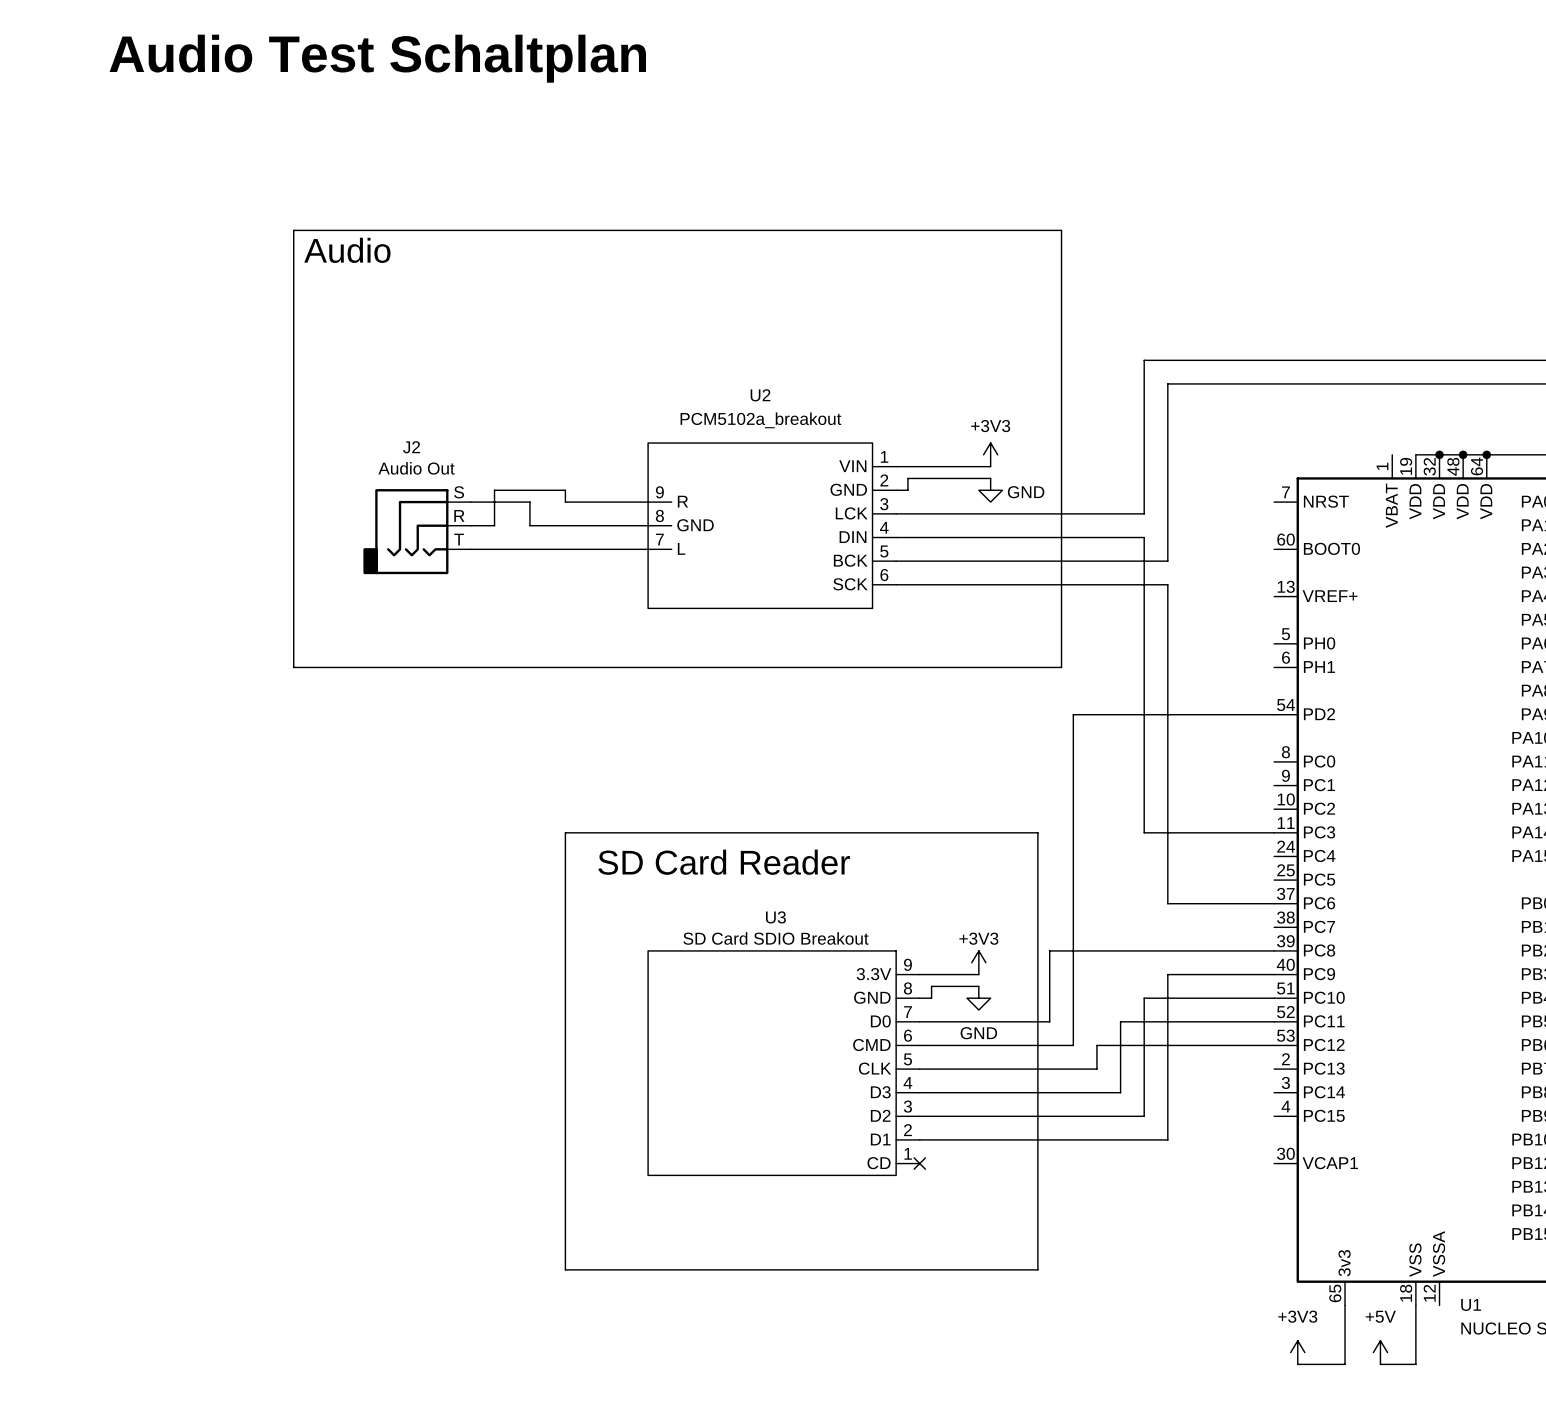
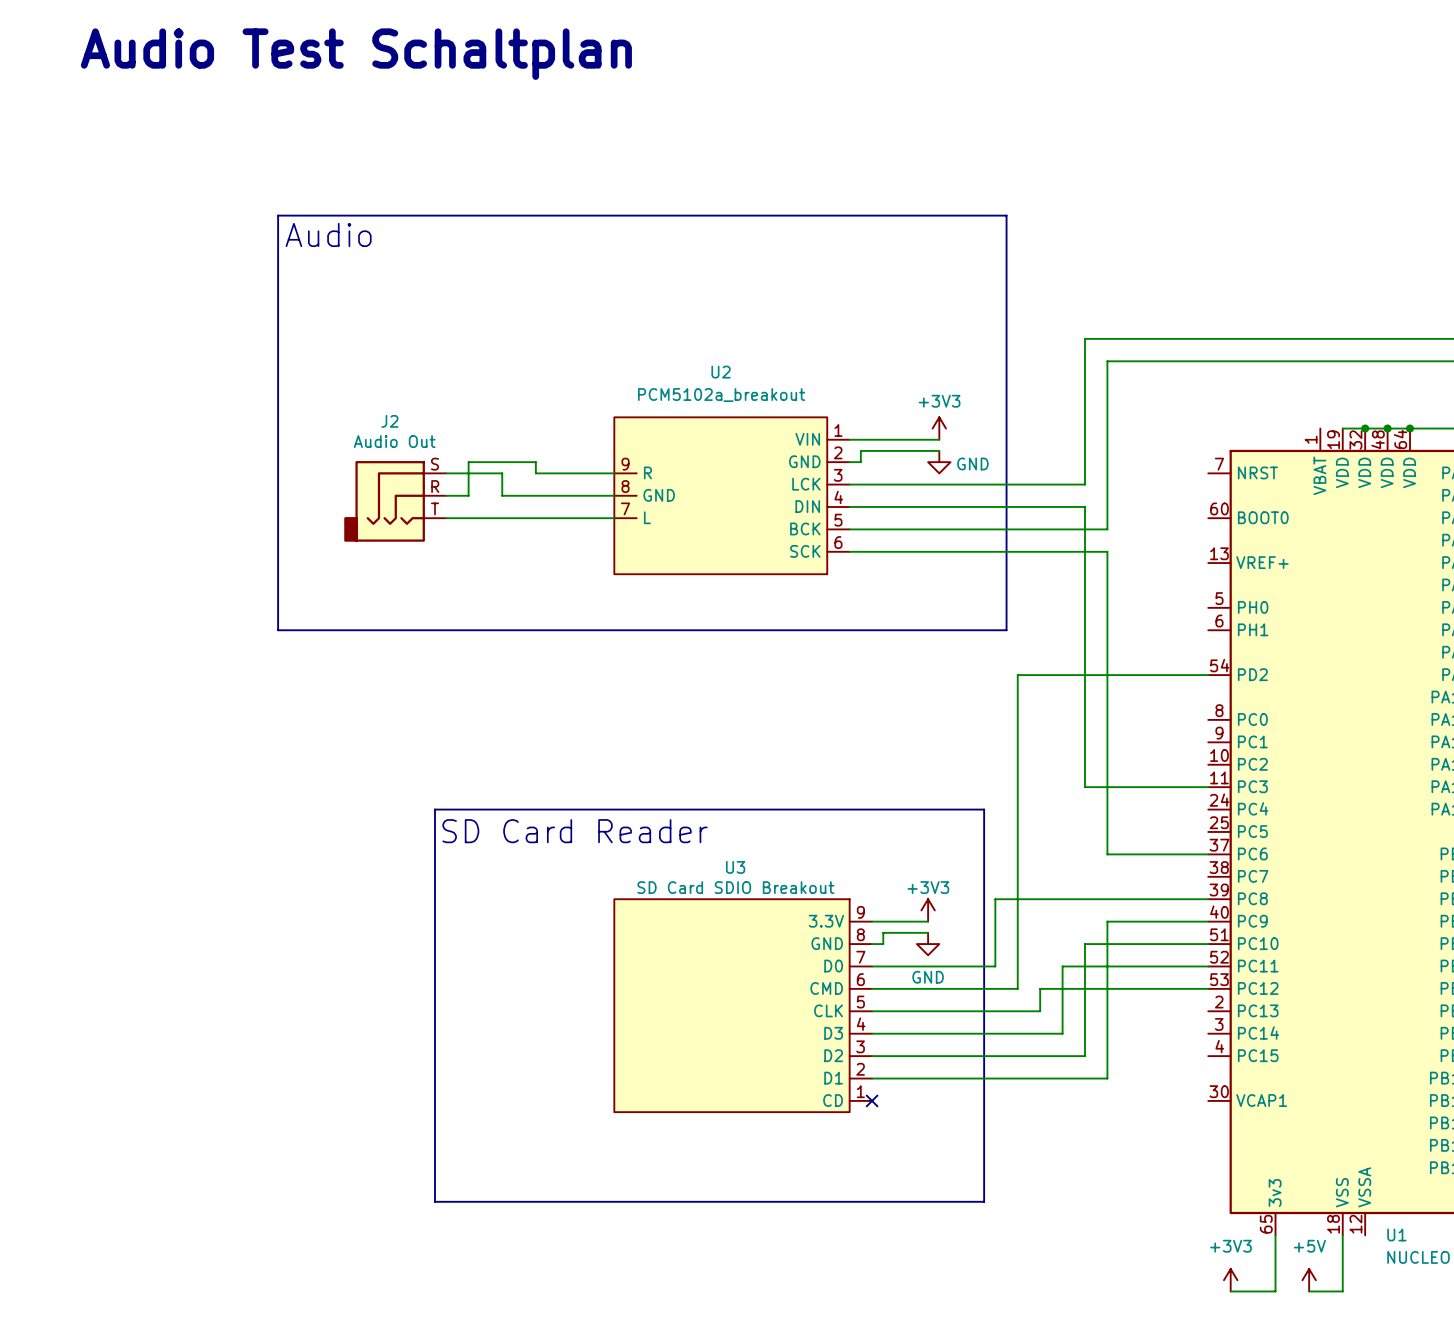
line: (1037, 856) (1037, 832) (565, 832) (565, 1269) -> (984, 809) (435, 809) (435, 1201) (535, 1201)
text position: SD Card Reader (724, 862) -> SD Card Reader (575, 831)

